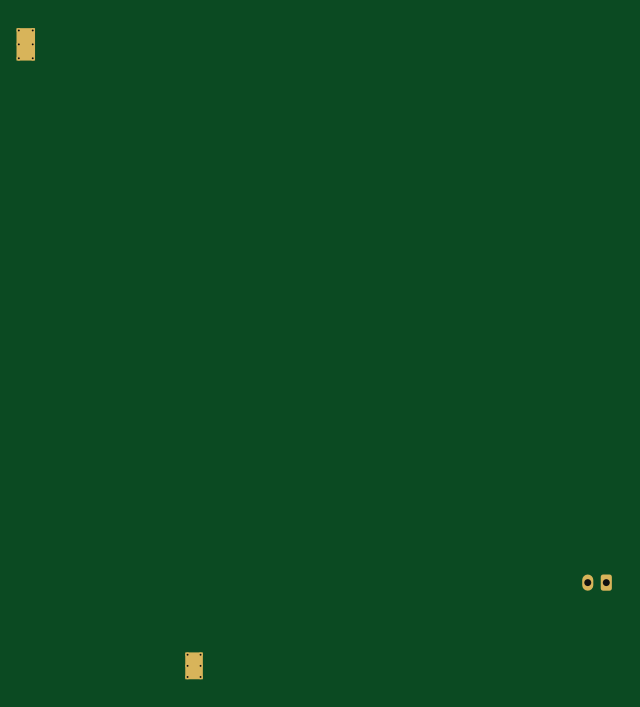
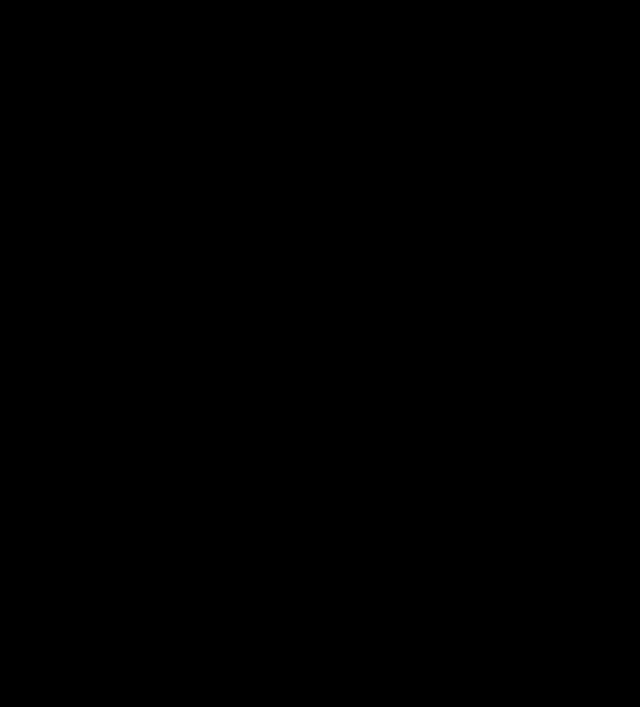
part: (25, 44) -> none
part: (597, 582) -> none
part: (194, 665) -> none

